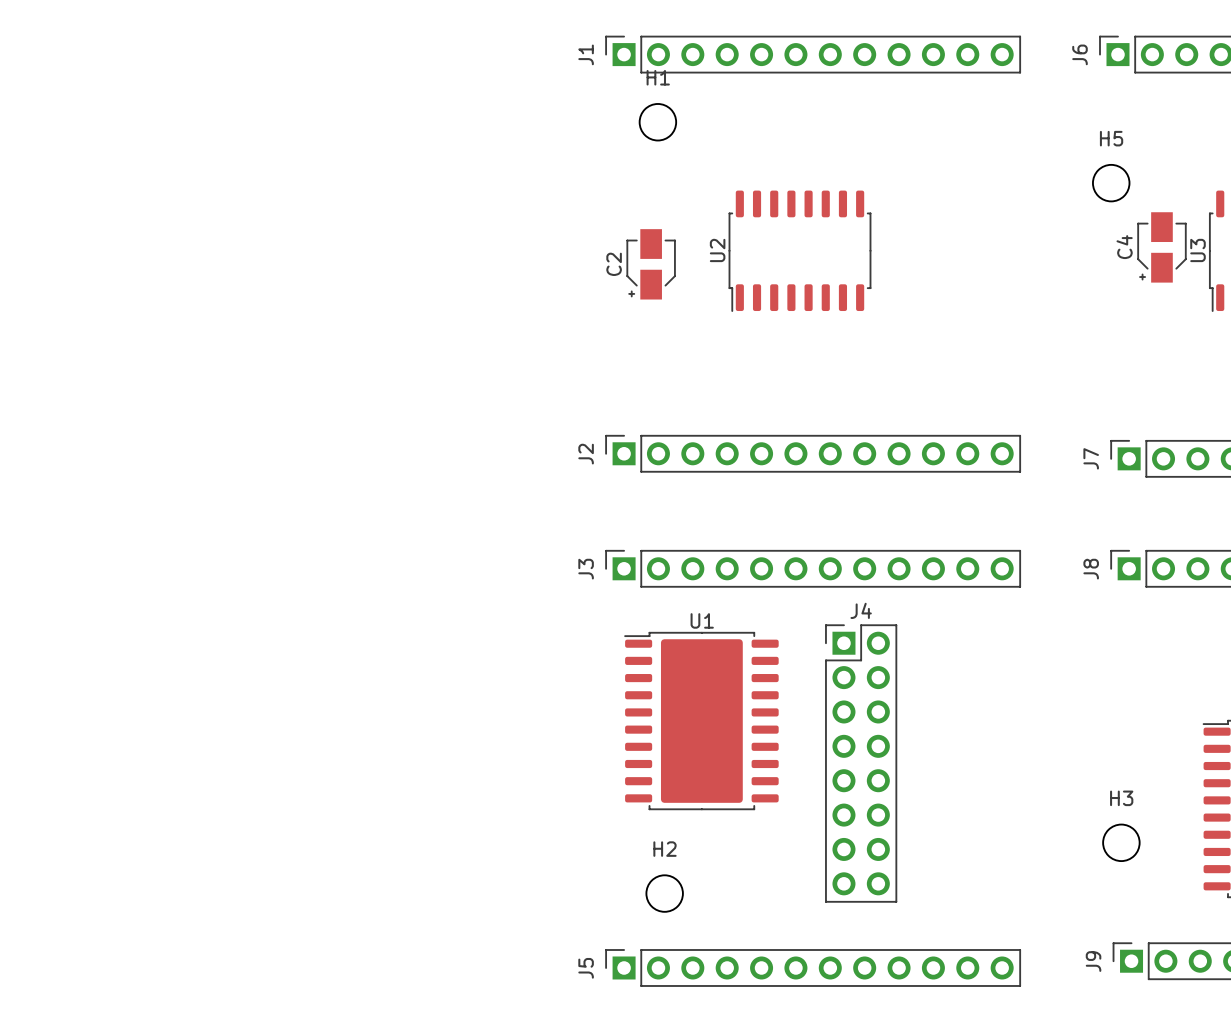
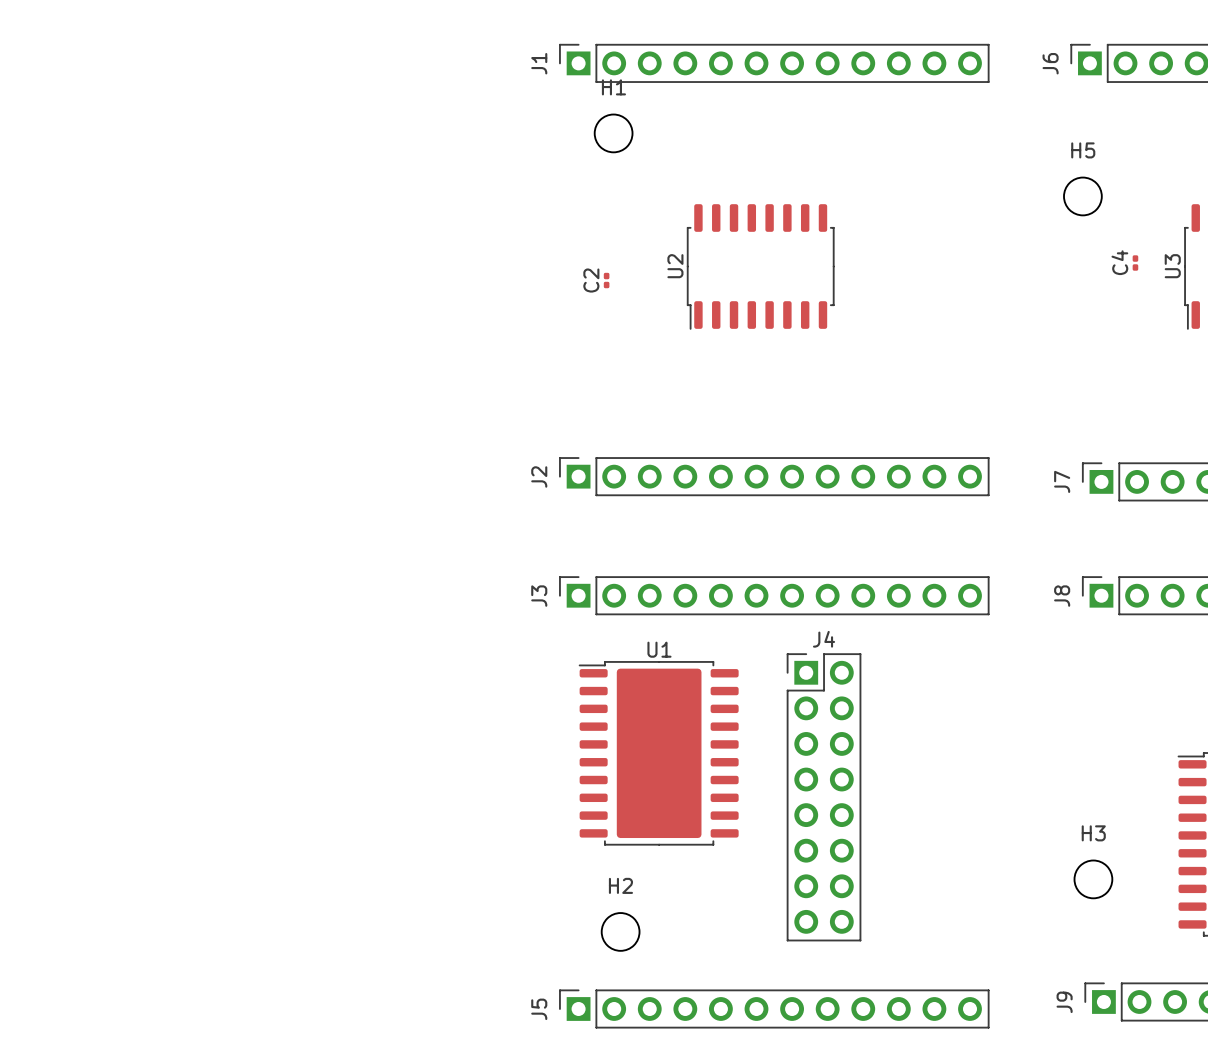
C4 footprint: [1137, 212, 1187, 283] -> [1132, 255, 1139, 271]
C2 footprint: [626, 229, 676, 300] -> [603, 272, 610, 289]

